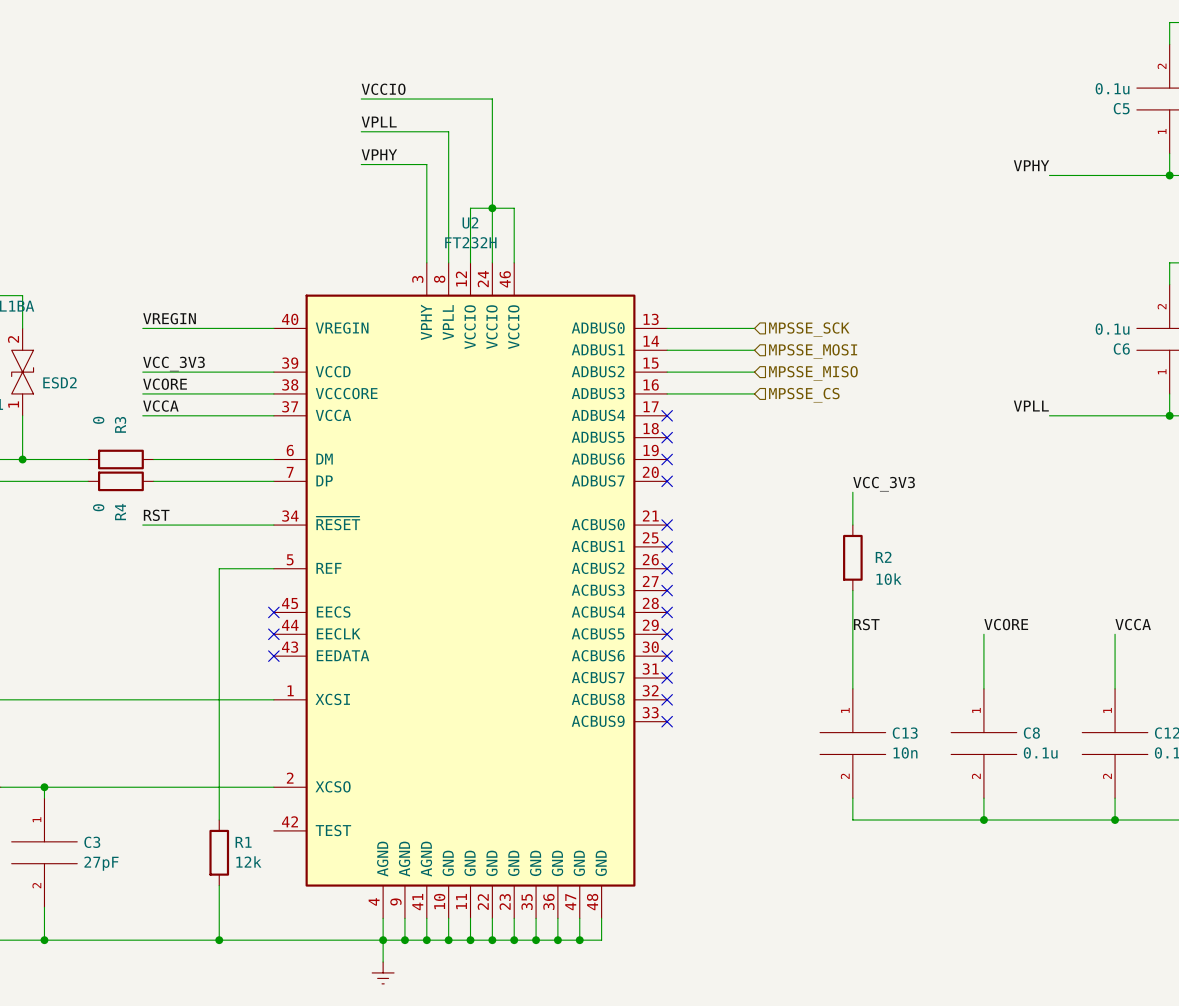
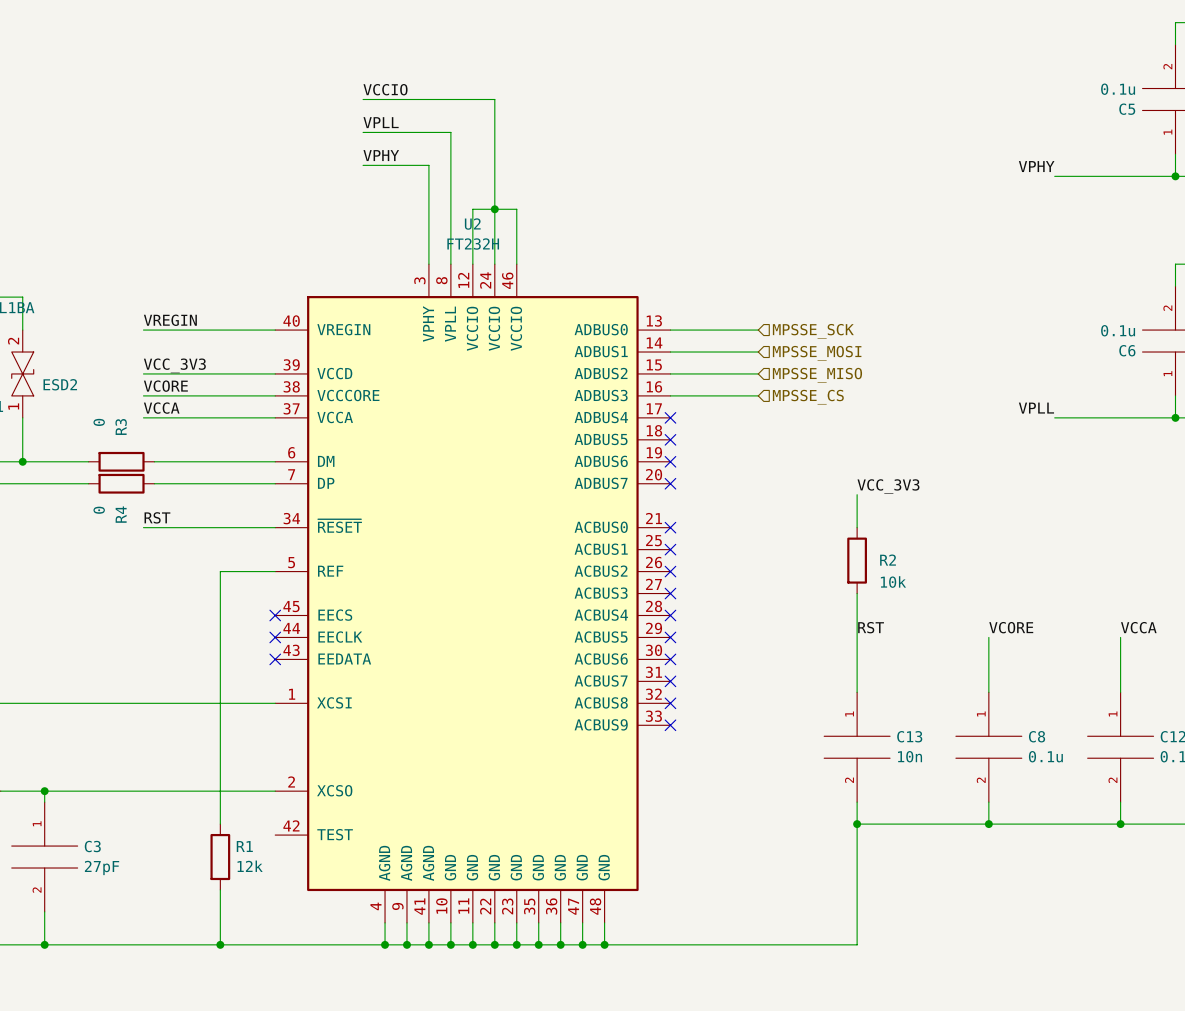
wire: none -> (857, 824) (857, 944) (604, 944)
junction: none -> (857, 824)
wire: (383, 940) (383, 962) -> none
junction: none -> (604, 944)
power symbol: (383, 972) -> none

